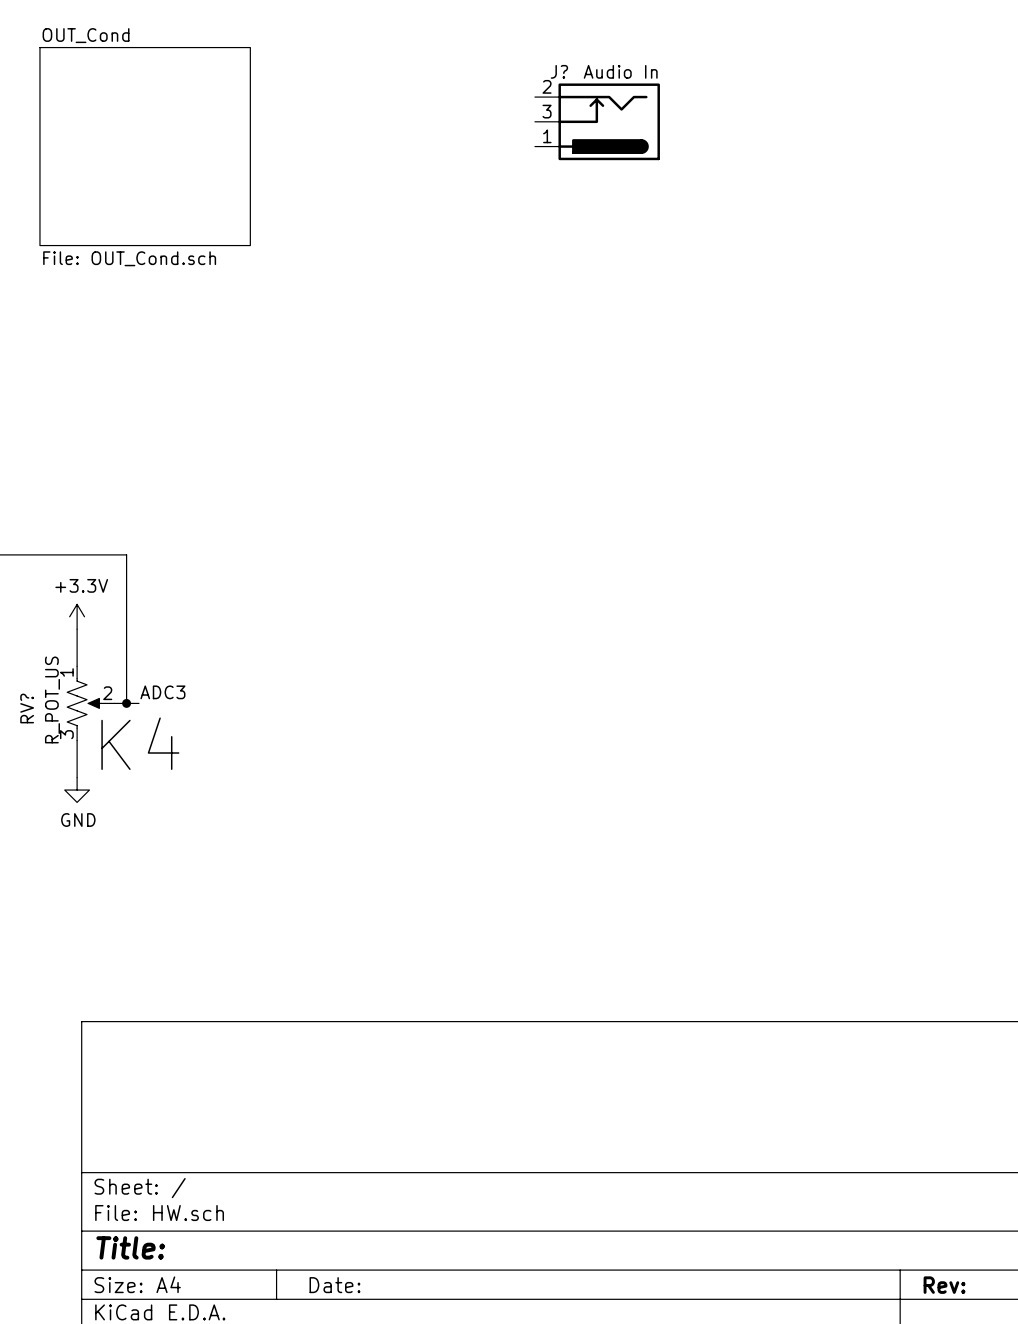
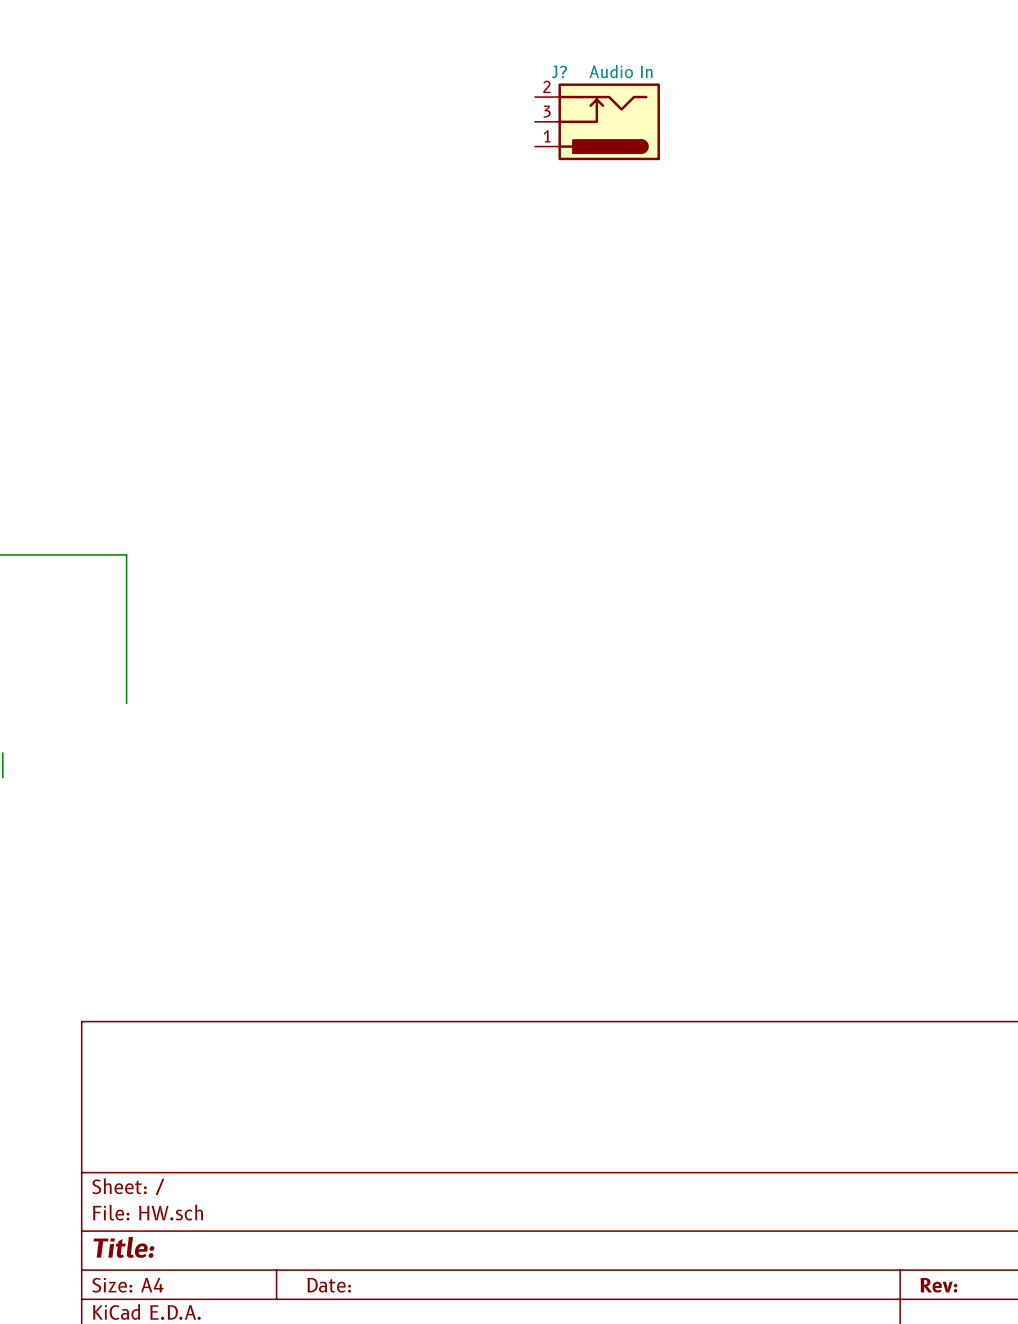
sheet OUT_Cond: File: OUT_Cond.sch (145, 146) -> none
power symbol: +3.3V (77, 616) -> none
wire: (77, 629) (77, 666) -> none
label: ADC3 (162, 692) -> none
RV?: R_POT_US (90, 703) -> none
wire: (114, 703) (138, 703) -> none
junction: (126, 703) -> none
wire: (77, 740) (77, 777) -> none
text: K4 (140, 743) -> none
wire: none -> (2, 752) (2, 777)
power symbol: GND (77, 790) -> none

